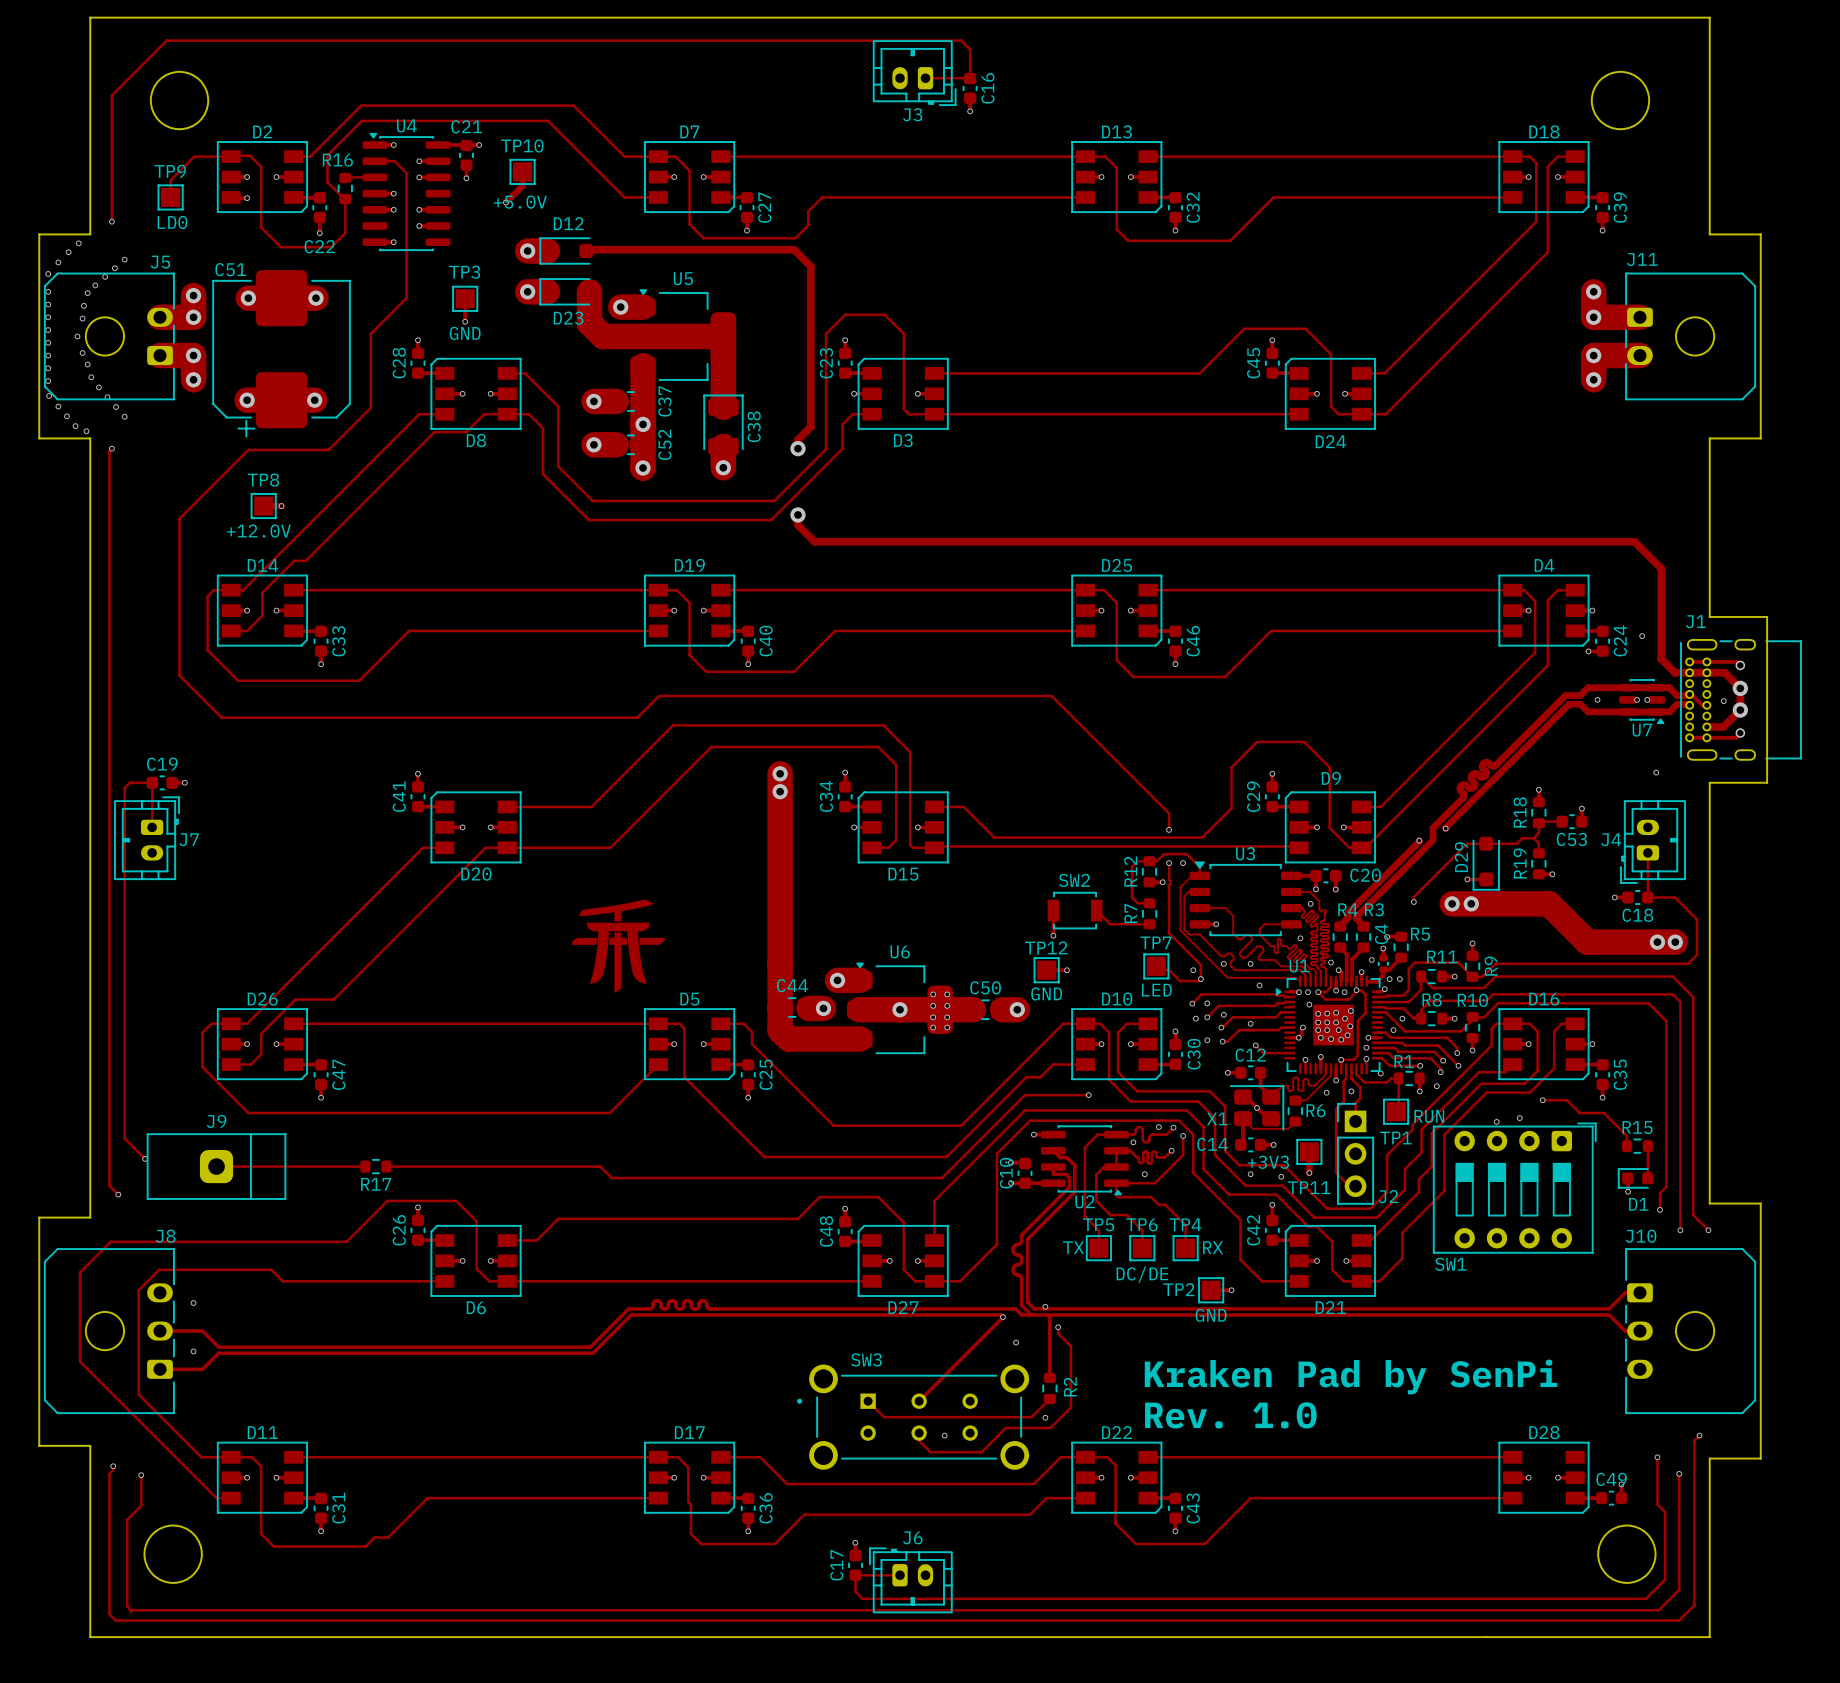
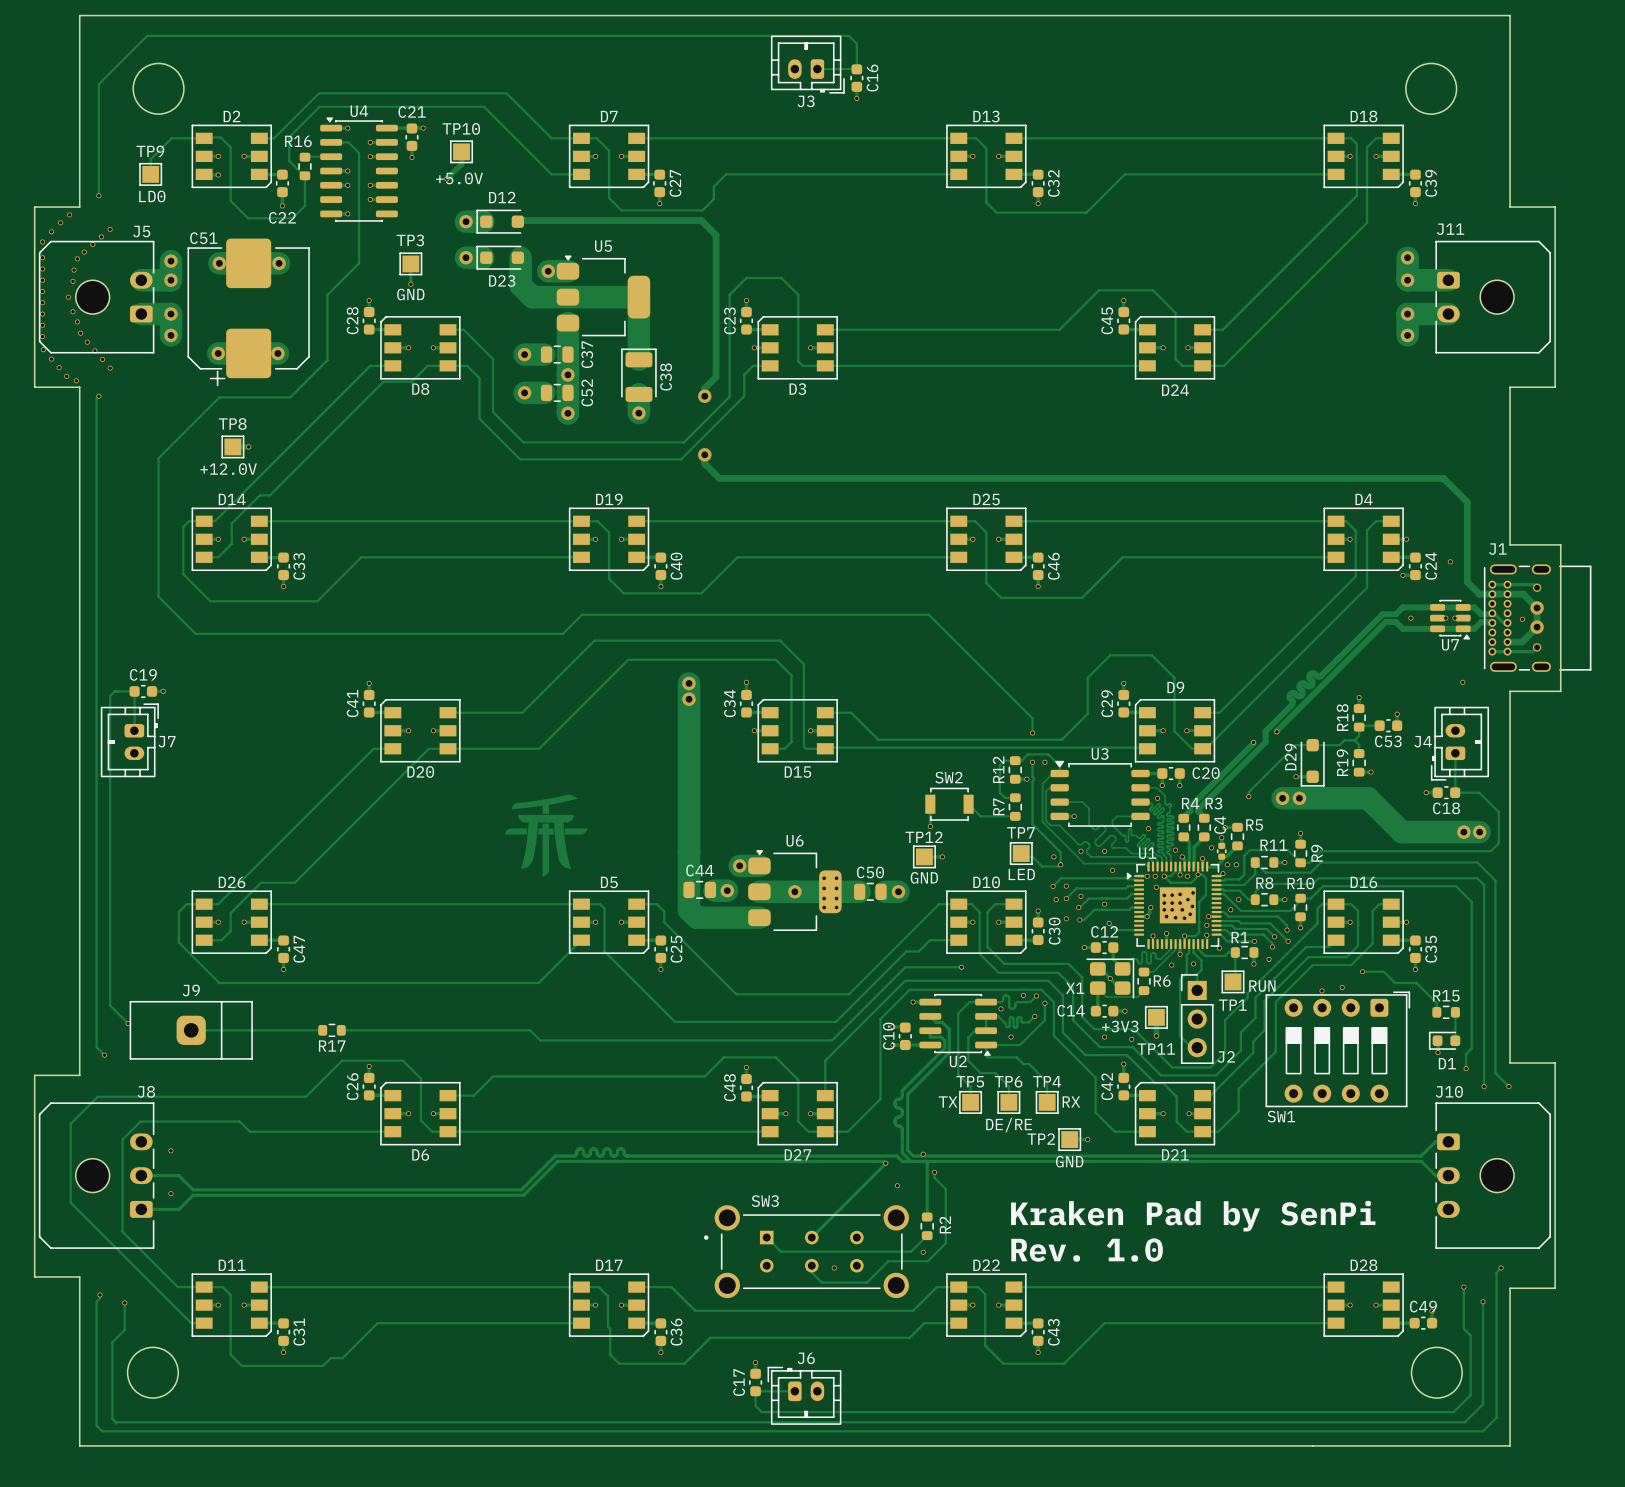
TP6 text: DC/DE (1142, 1274) -> DE/RE (1009, 1125)

